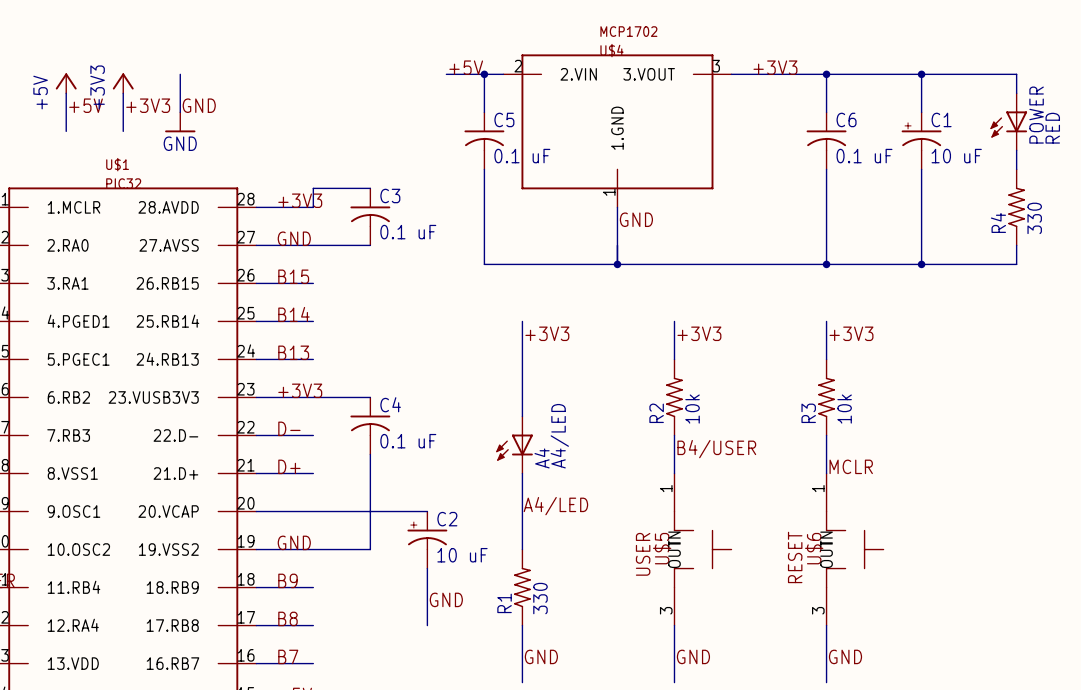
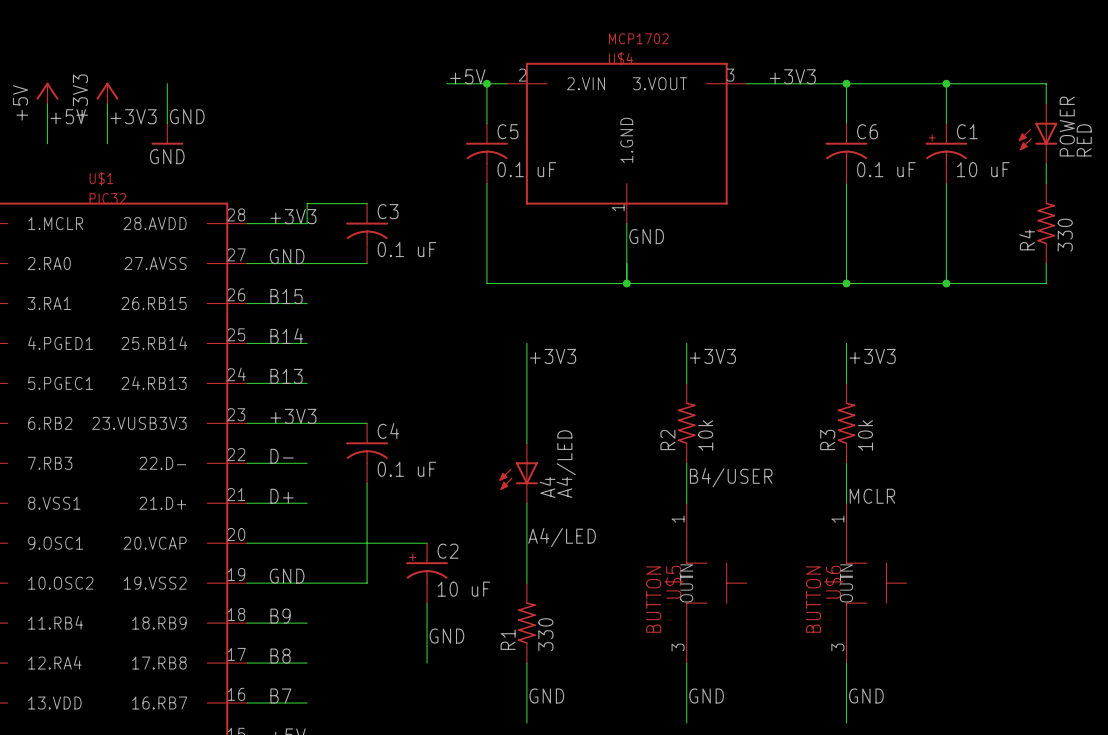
U$5 value: USER (643, 554) -> BUTTON (653, 599)
U$6 value: RESET (795, 557) -> BUTTON (813, 599)

